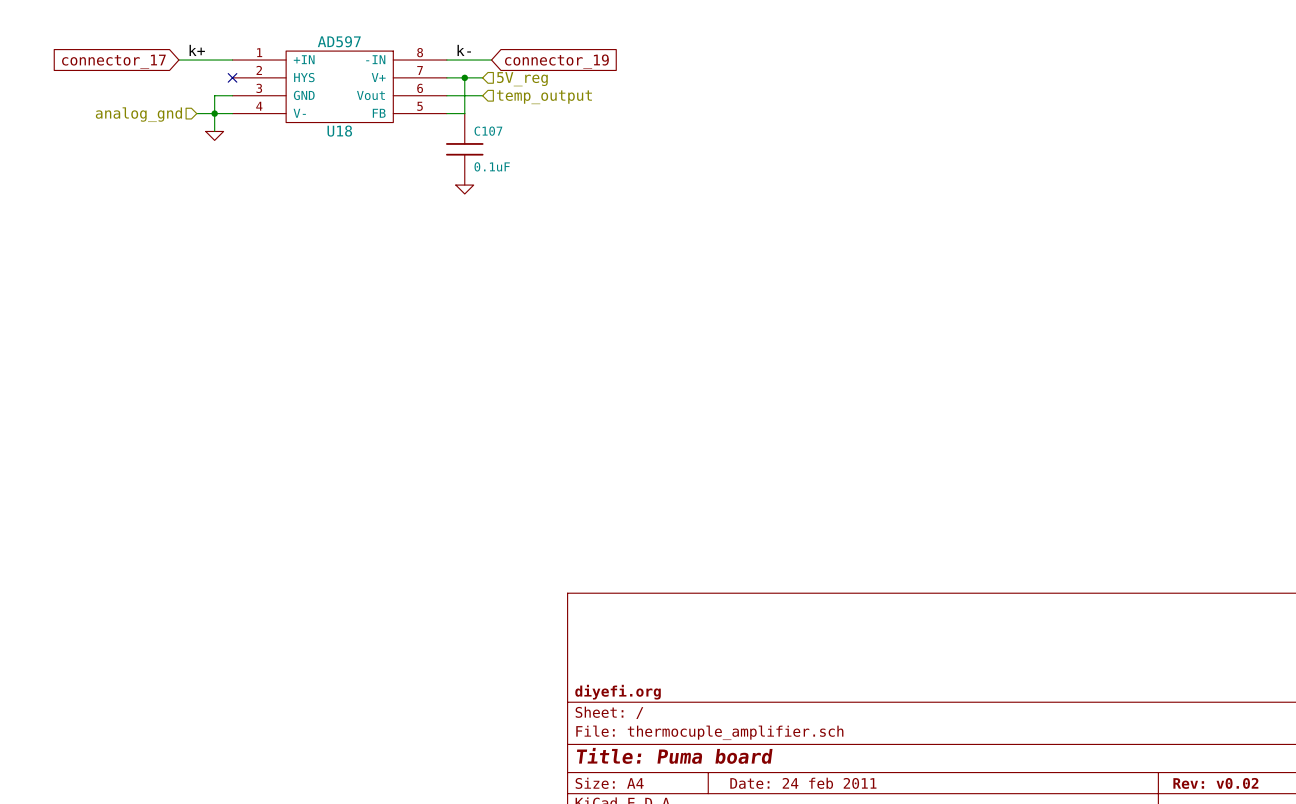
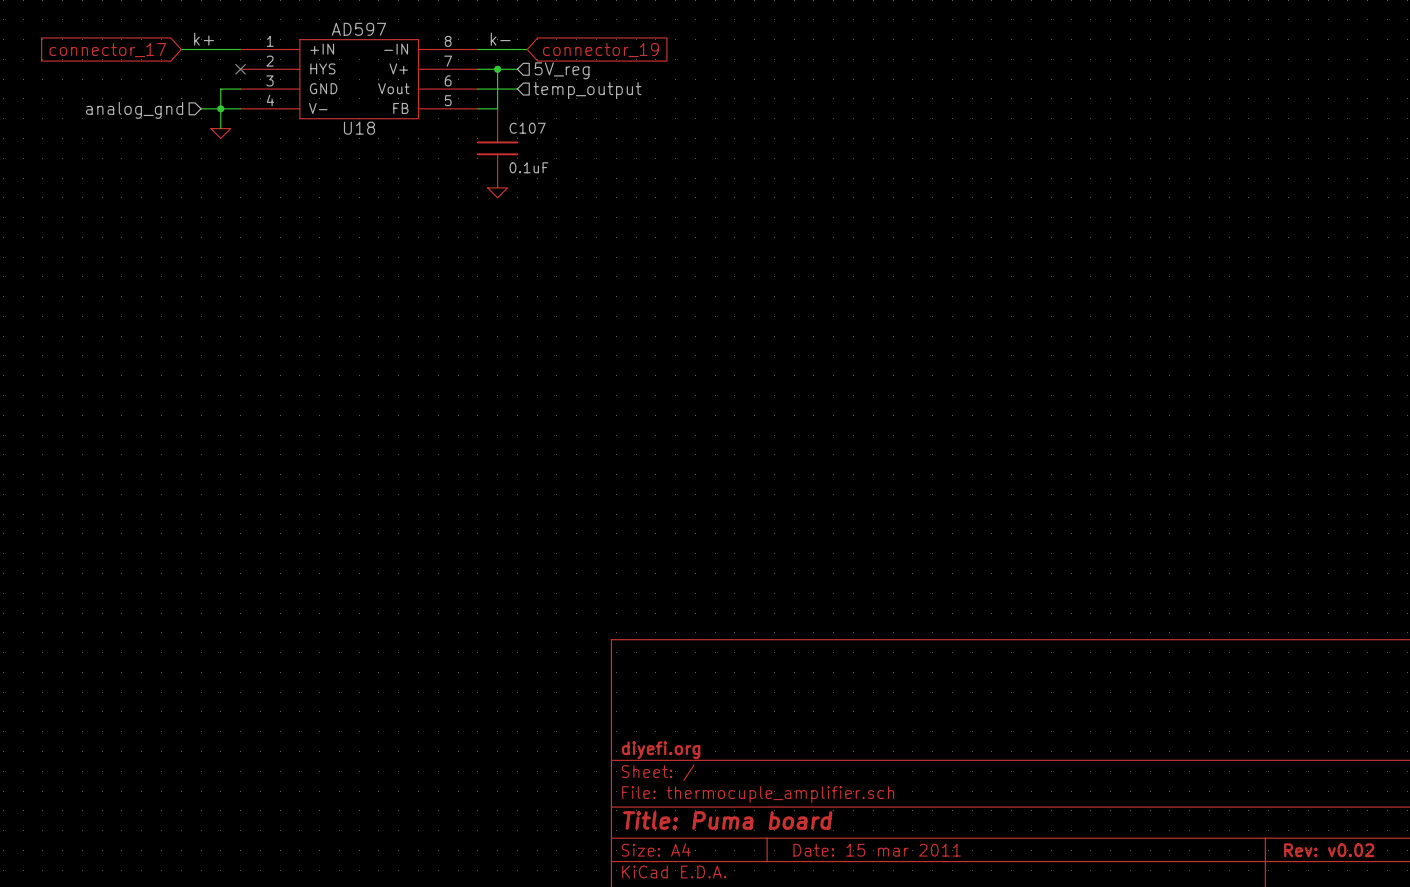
title block: Date: 24 feb 2011 (803, 783) -> Date: 15 mar 2011 (877, 850)

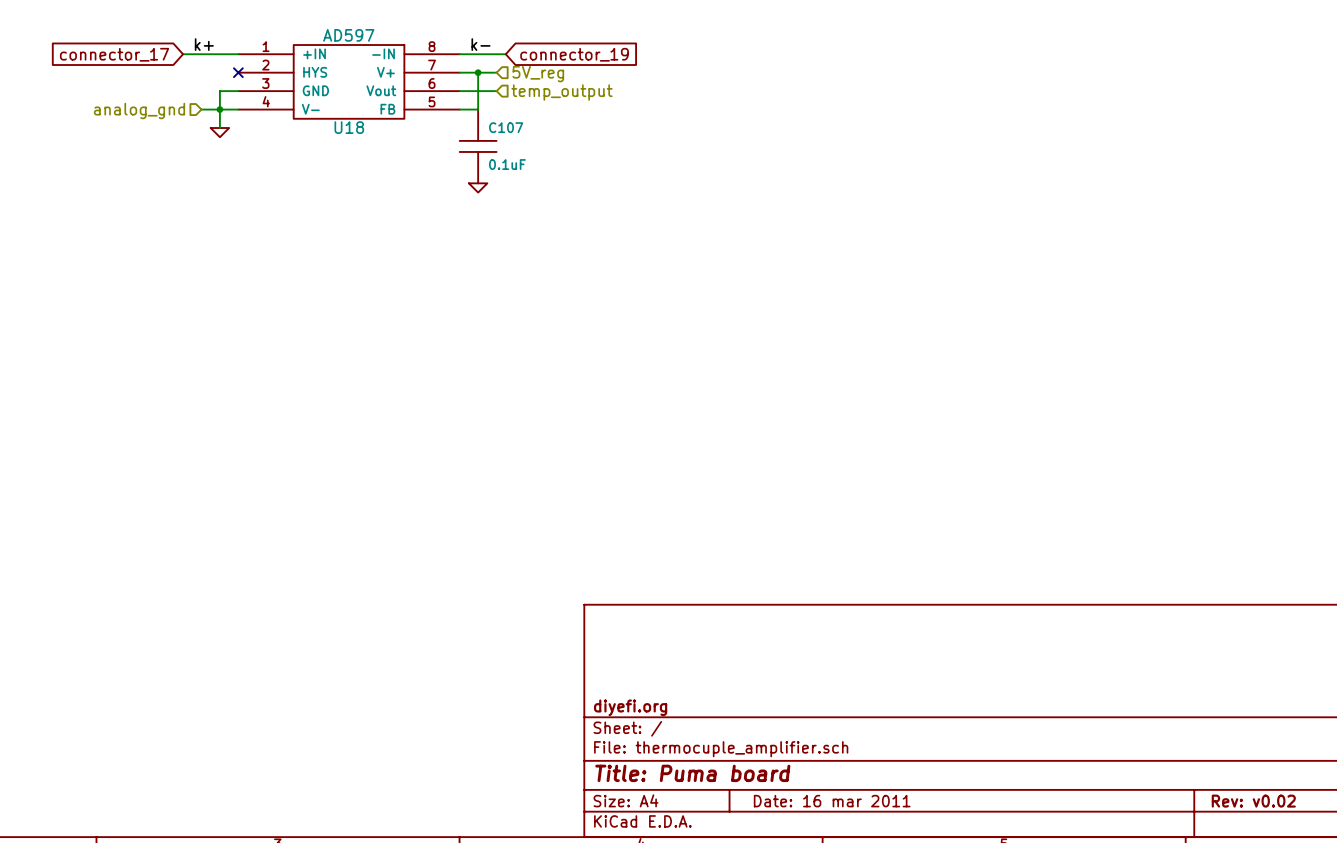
title block: Date: 15 mar 2011 (877, 850) -> Date: 16 mar 2011 (832, 801)

